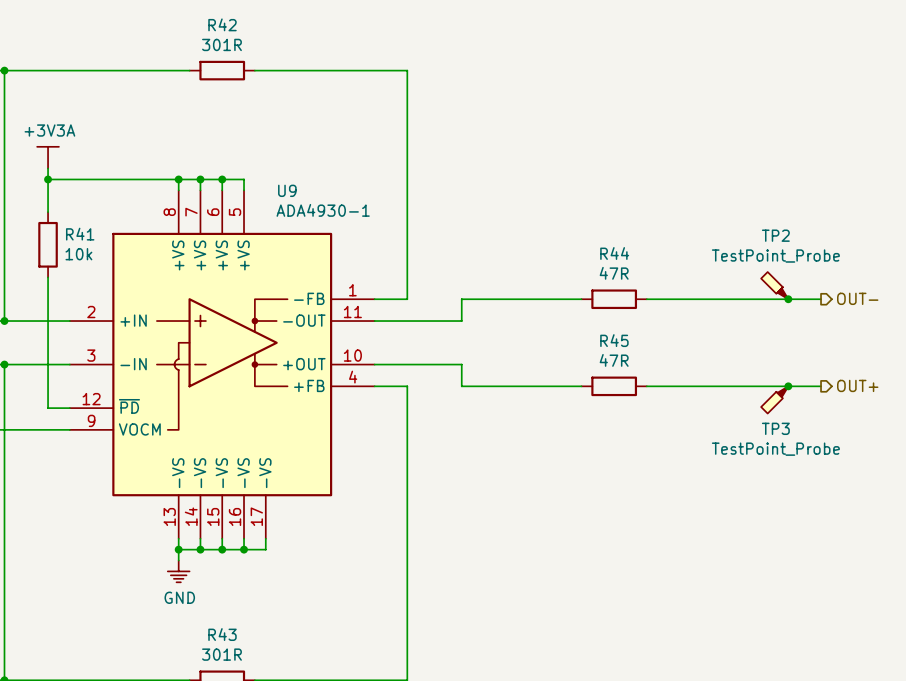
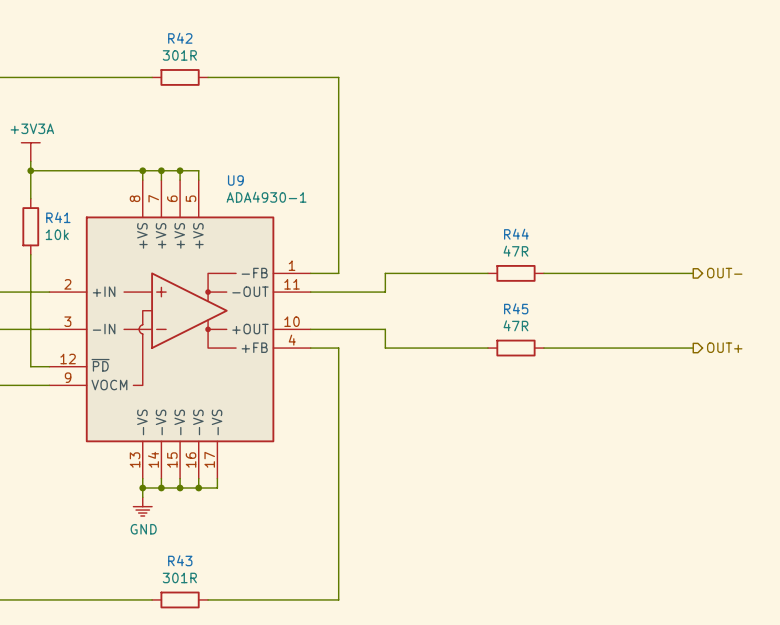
TP2: TestPoint_Probe (774, 285) -> none
junction: (788, 299) -> none
junction: (788, 386) -> none
TP3: TestPoint_Probe (774, 399) -> none

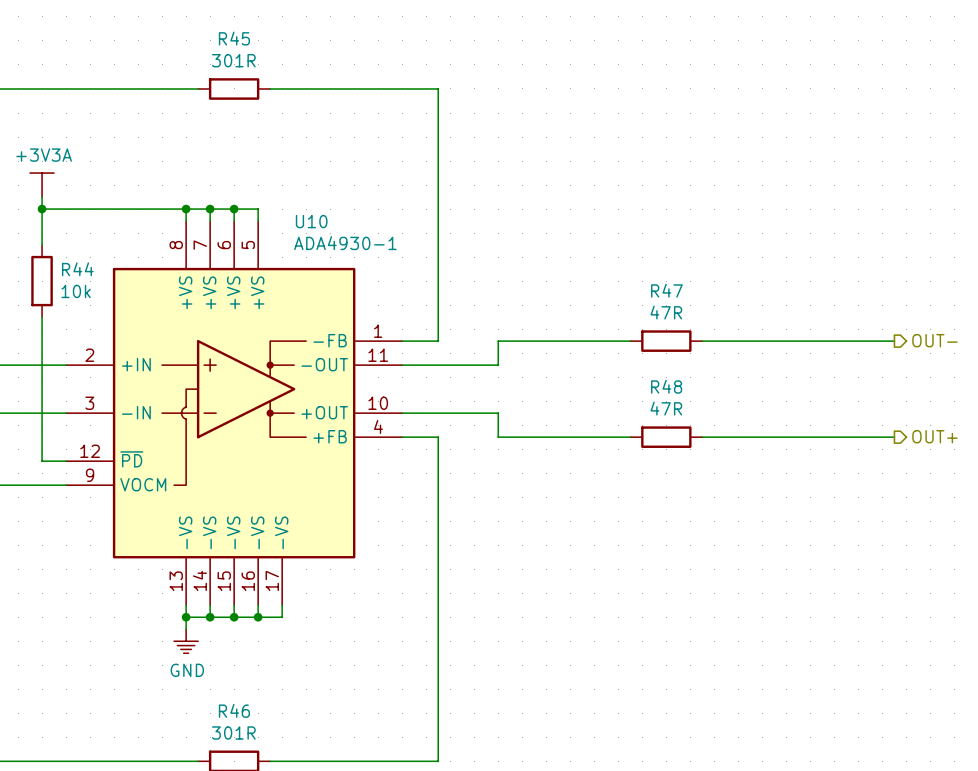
R42 name: R42 (180, 38) -> R45 (234, 38)
U9 name: U9 (235, 180) -> U10 (311, 221)
R41 name: R41 (58, 217) -> R44 (77, 269)
R44 name: R44 (516, 234) -> R47 (666, 290)
R45 name: R45 (516, 308) -> R48 (666, 386)
R43 name: R43 (180, 560) -> R46 (234, 710)

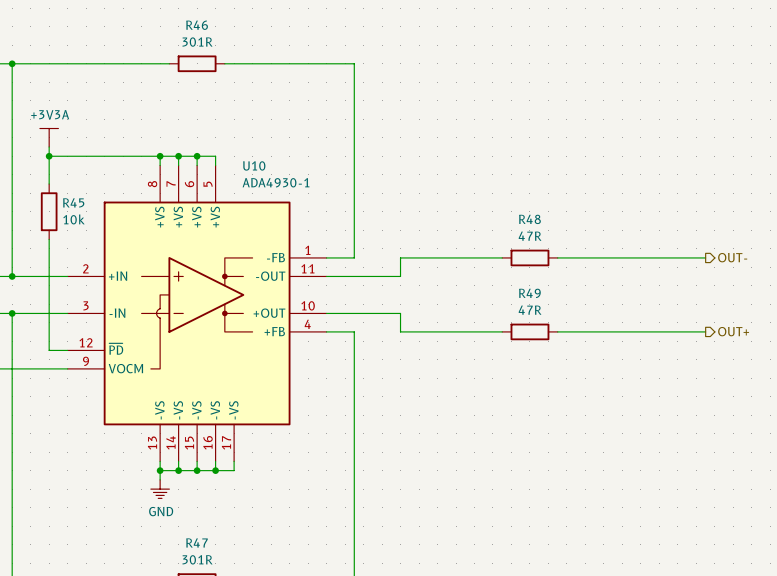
R45 name: R45 (234, 38) -> R46 (197, 25)
R44 name: R44 (77, 269) -> R45 (73, 202)
R47 name: R47 (666, 290) -> R48 (529, 219)
R48 name: R48 (666, 386) -> R49 (529, 293)
R46 name: R46 (234, 710) -> R47 (196, 542)

